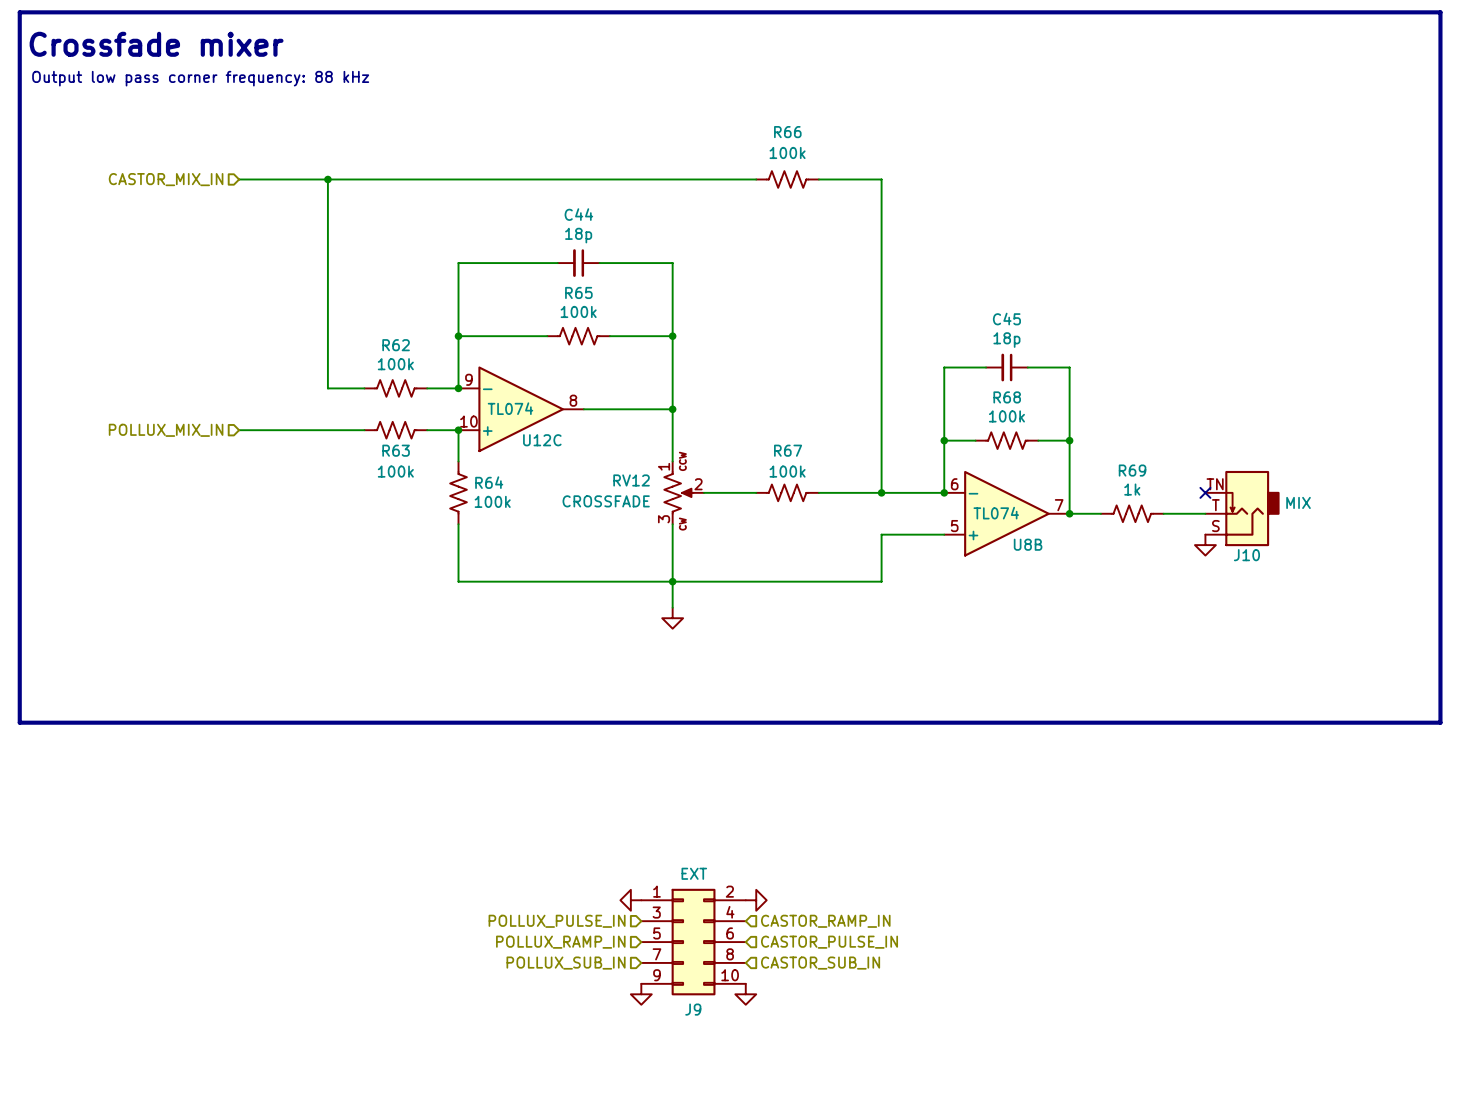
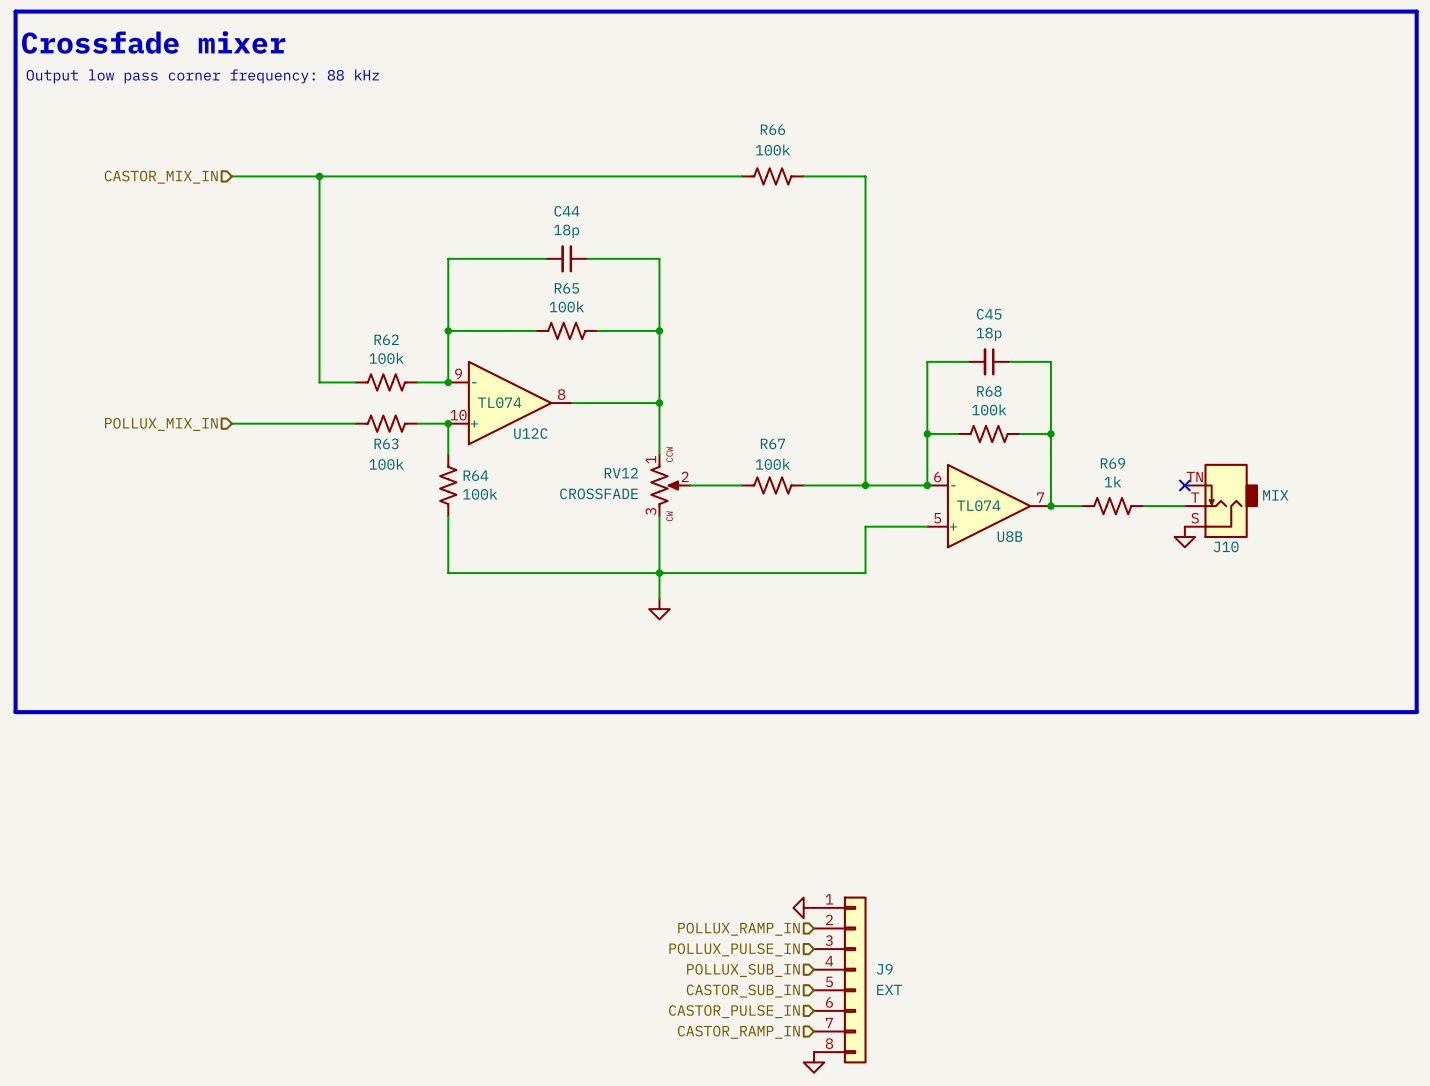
J9 value position: EXT (694, 873) -> EXT (889, 989)
J9 symbol: [641, 888, 746, 996] -> [814, 896, 867, 1064]
power symbol: (630, 900) -> none
power symbol: (756, 900) -> none
hierarchical label position: POLLUX_PULSE_IN (557, 921) -> POLLUX_PULSE_IN (734, 949)
power symbol: none -> (803, 907)
hierarchical label rotation: 0° (825, 921) -> 180° (738, 1032)
hierarchical label position: CASTOR_RAMP_IN (825, 921) -> CASTOR_RAMP_IN (738, 1032)
hierarchical label position: POLLUX_RAMP_IN (560, 942) -> POLLUX_RAMP_IN (739, 929)
hierarchical label rotation: 0° (829, 942) -> 180° (734, 1011)
hierarchical label position: POLLUX_SUB_IN (566, 963) -> POLLUX_SUB_IN (743, 970)
hierarchical label rotation: 0° (820, 963) -> 180° (743, 991)
power symbol: (641, 994) -> none
power symbol: (745, 994) -> none
J9 name position: J9 (693, 1009) -> J9 (884, 969)
power symbol: none -> (814, 1062)

